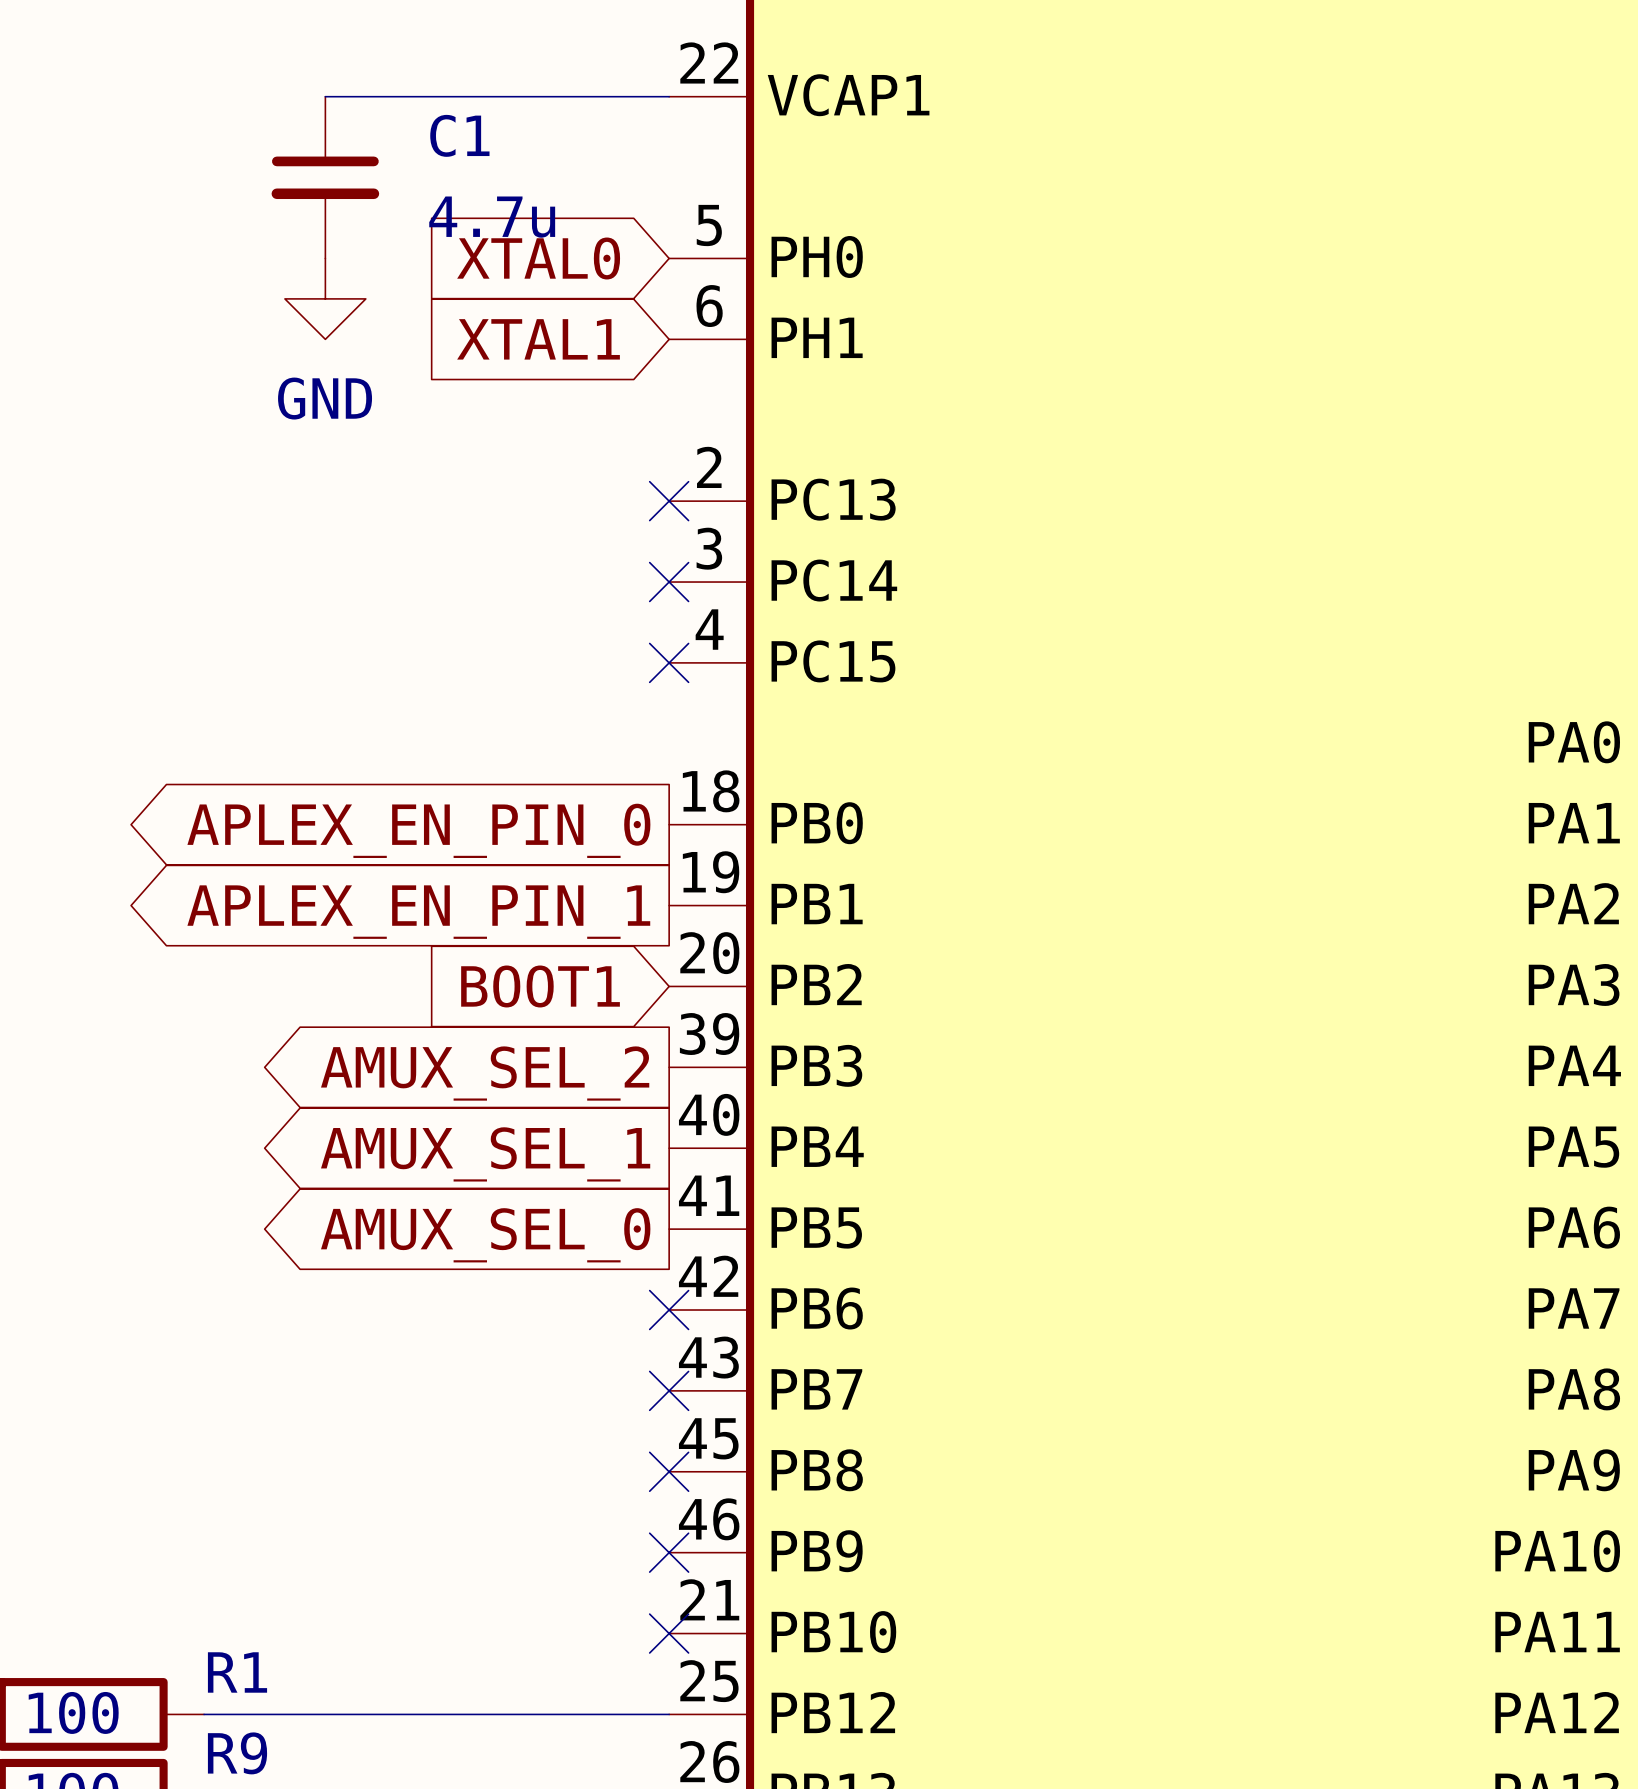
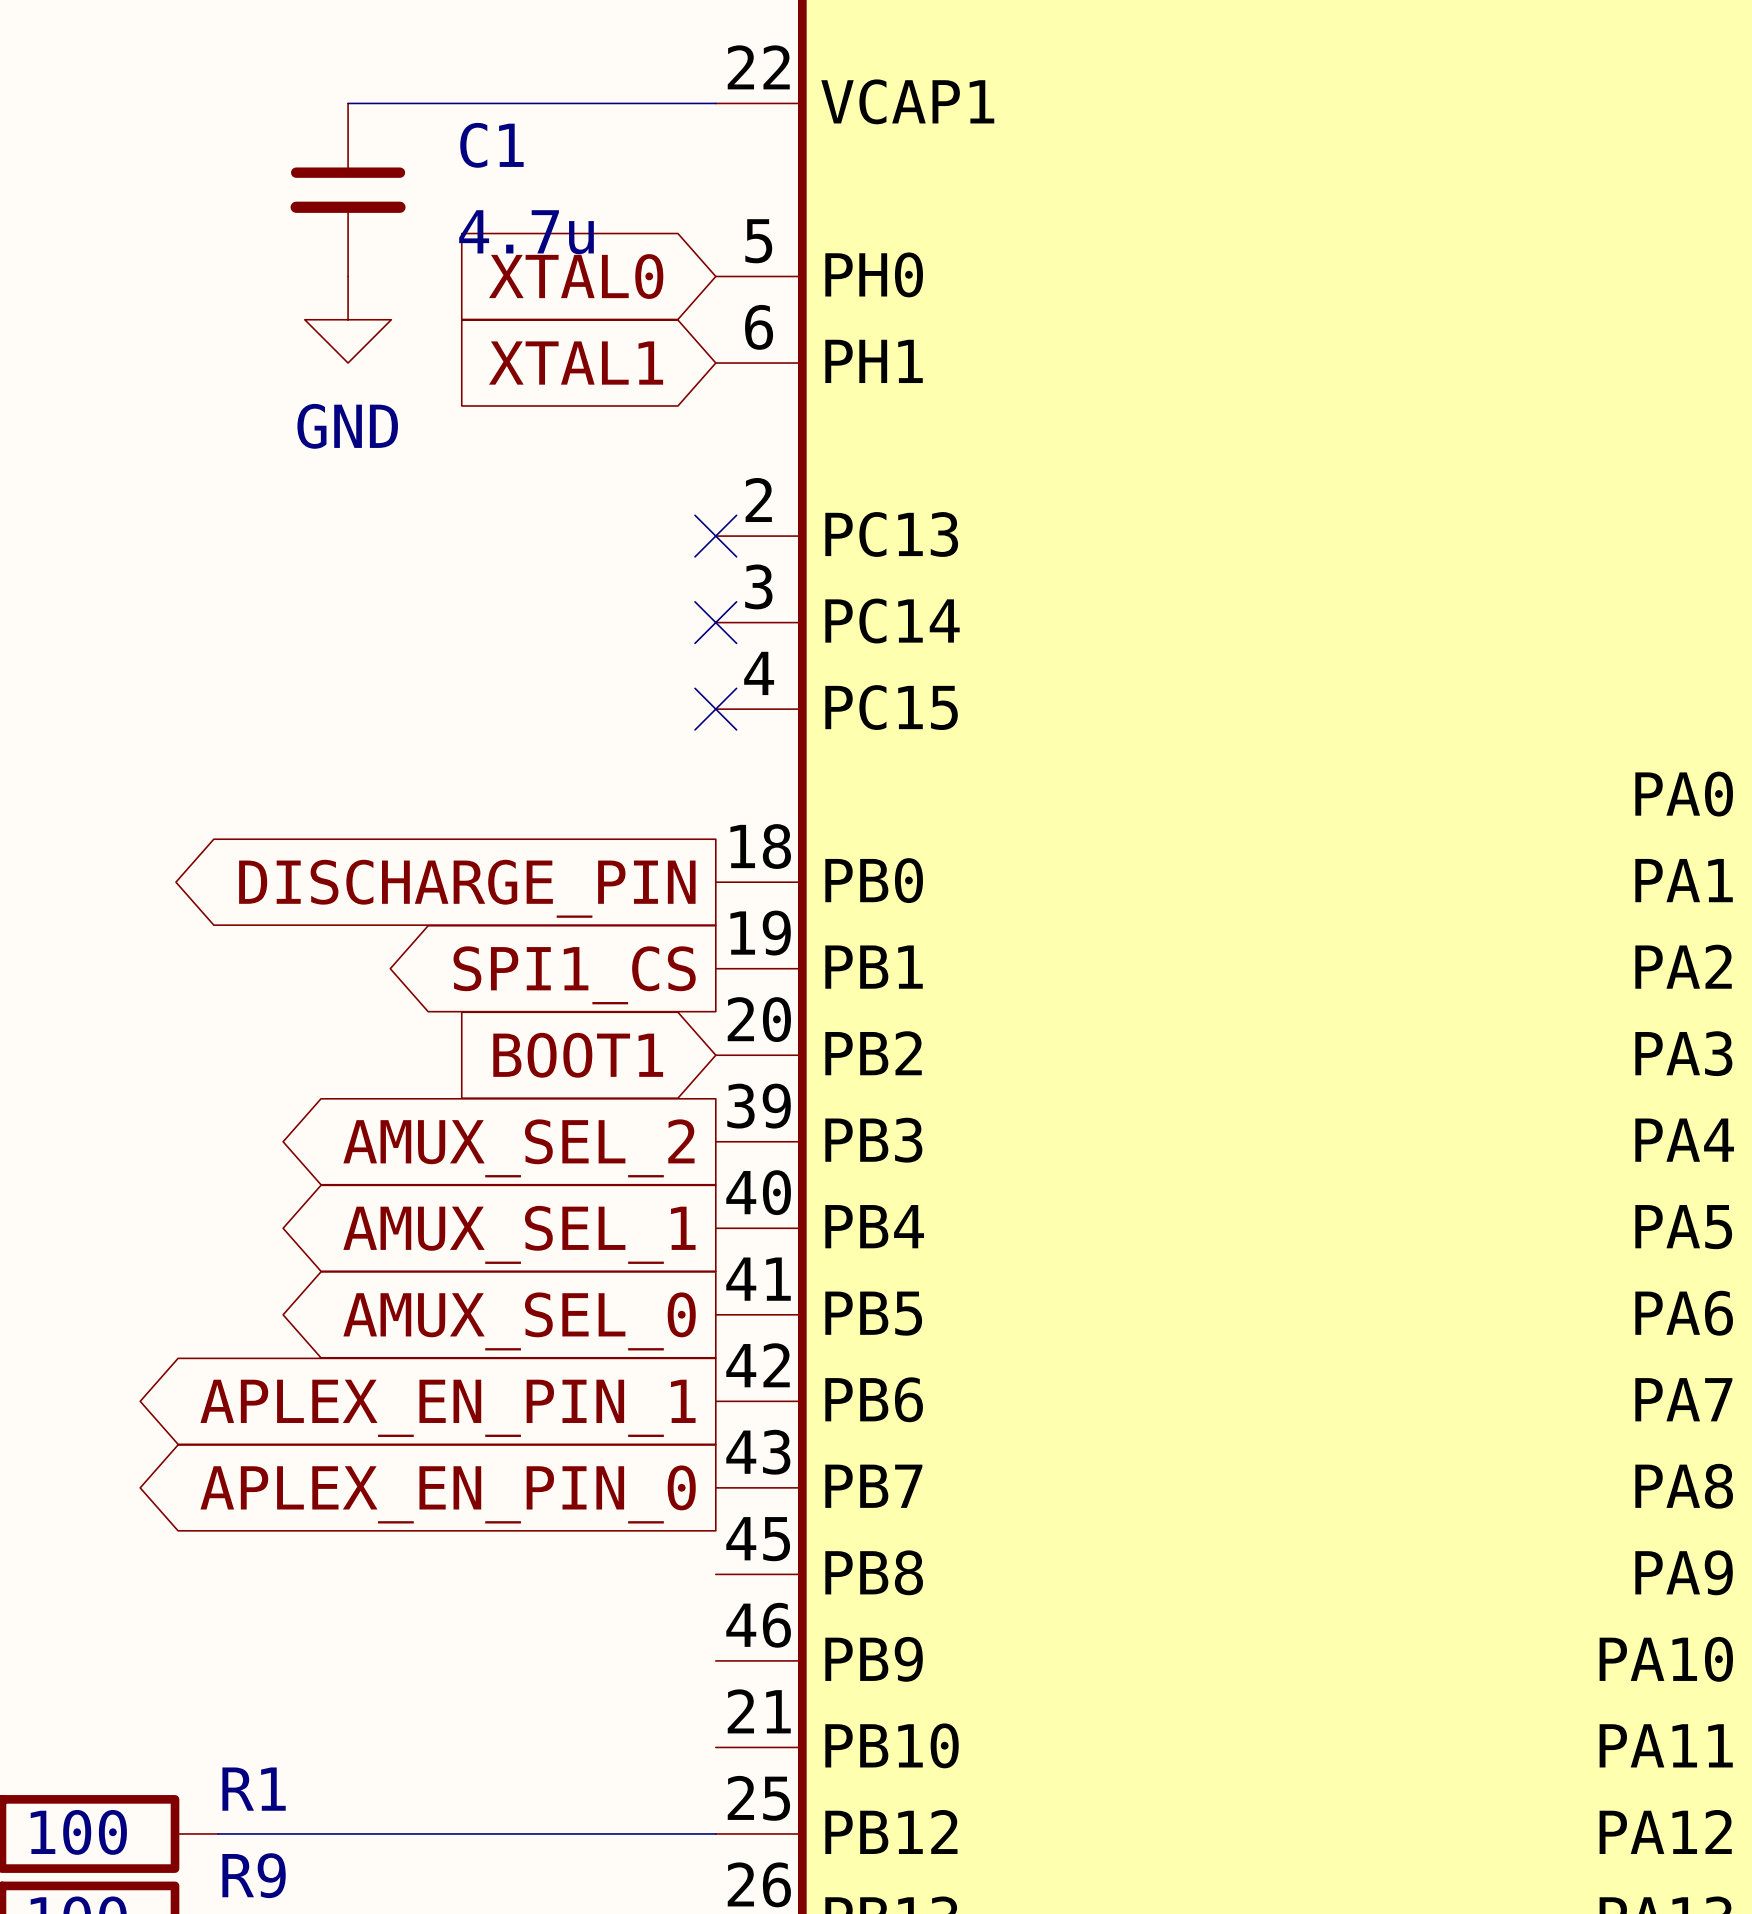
global label: APLEX_EN_PIN_0 (418, 830) -> DISCHARGE_PIN (467, 888)
global label: APLEX_EN_PIN_1 (418, 912) -> SPI1_CS (574, 975)
no-connect mark: (669, 1310) -> none
global label: none -> APLEX_EN_PIN_1 (448, 1408)
no-connect mark: (669, 1390) -> none
global label: none -> APLEX_EN_PIN_0 (448, 1494)
no-connect mark: (669, 1471) -> none
no-connect mark: (669, 1552) -> none
no-connect mark: (669, 1633) -> none

